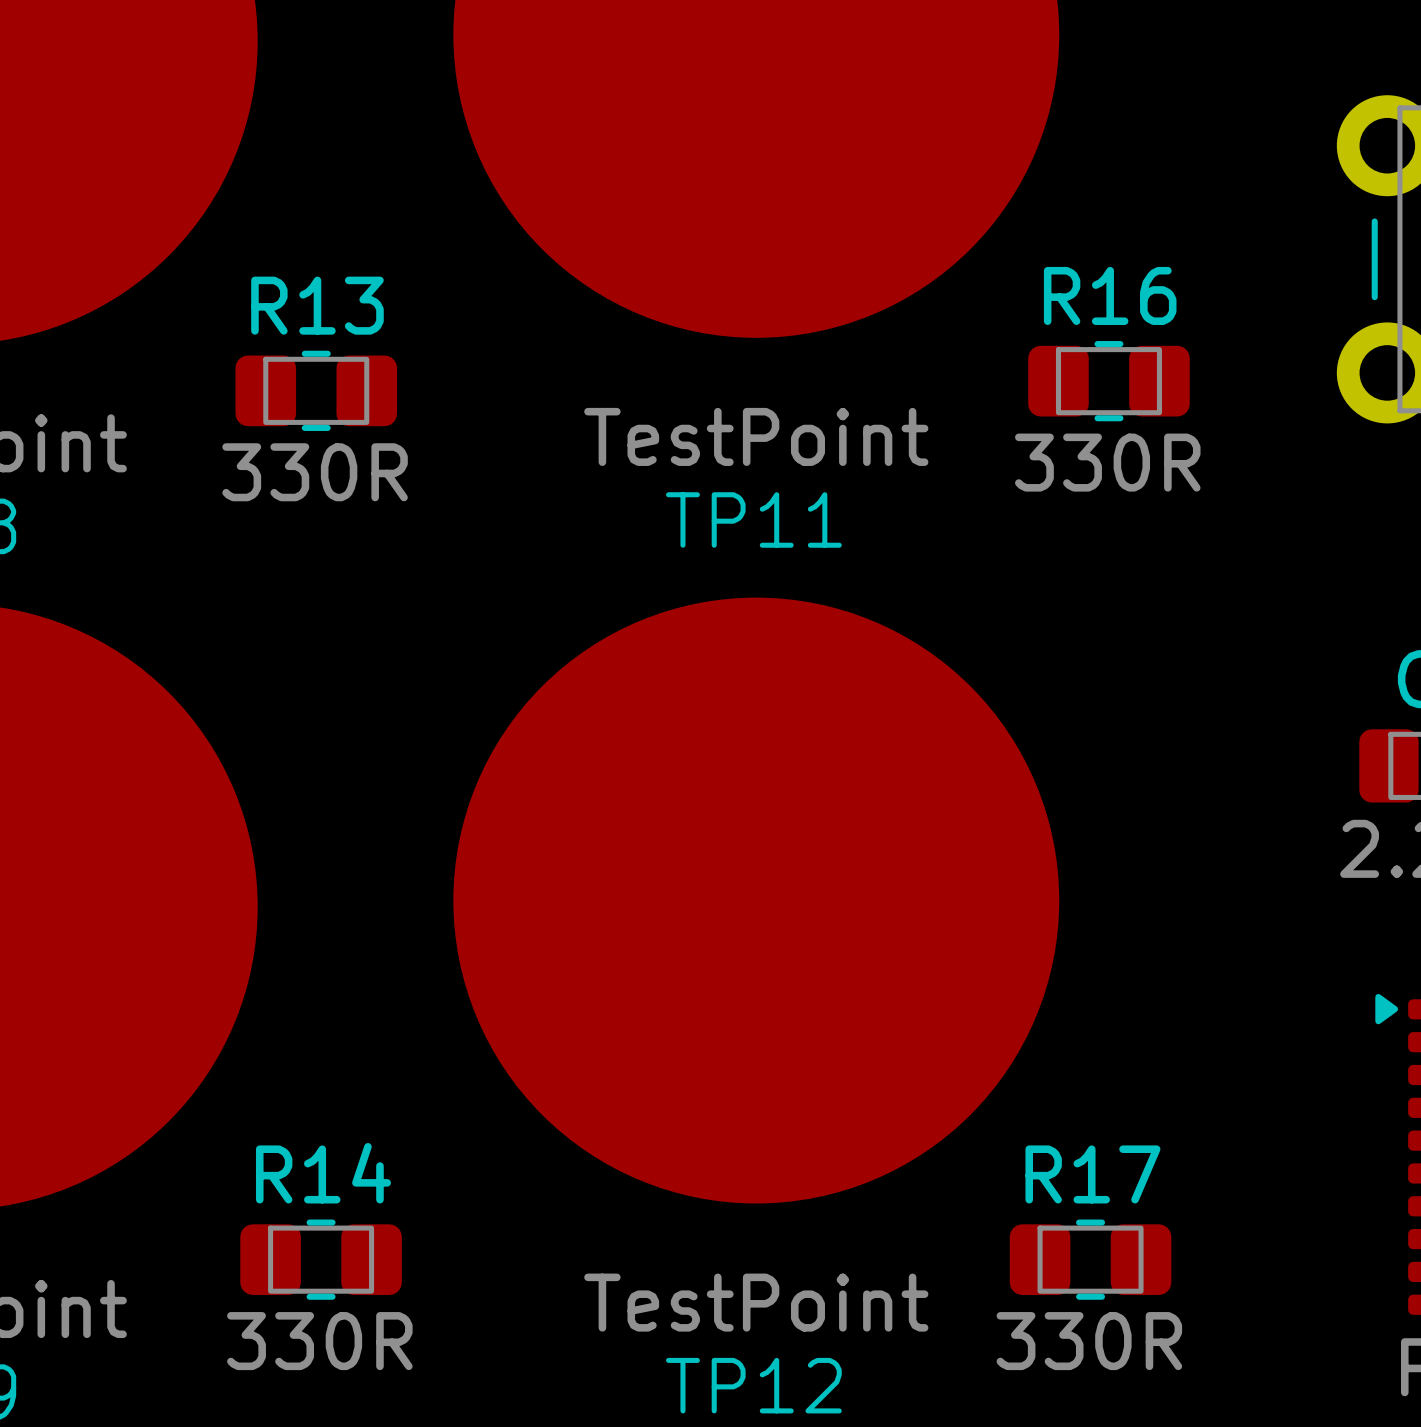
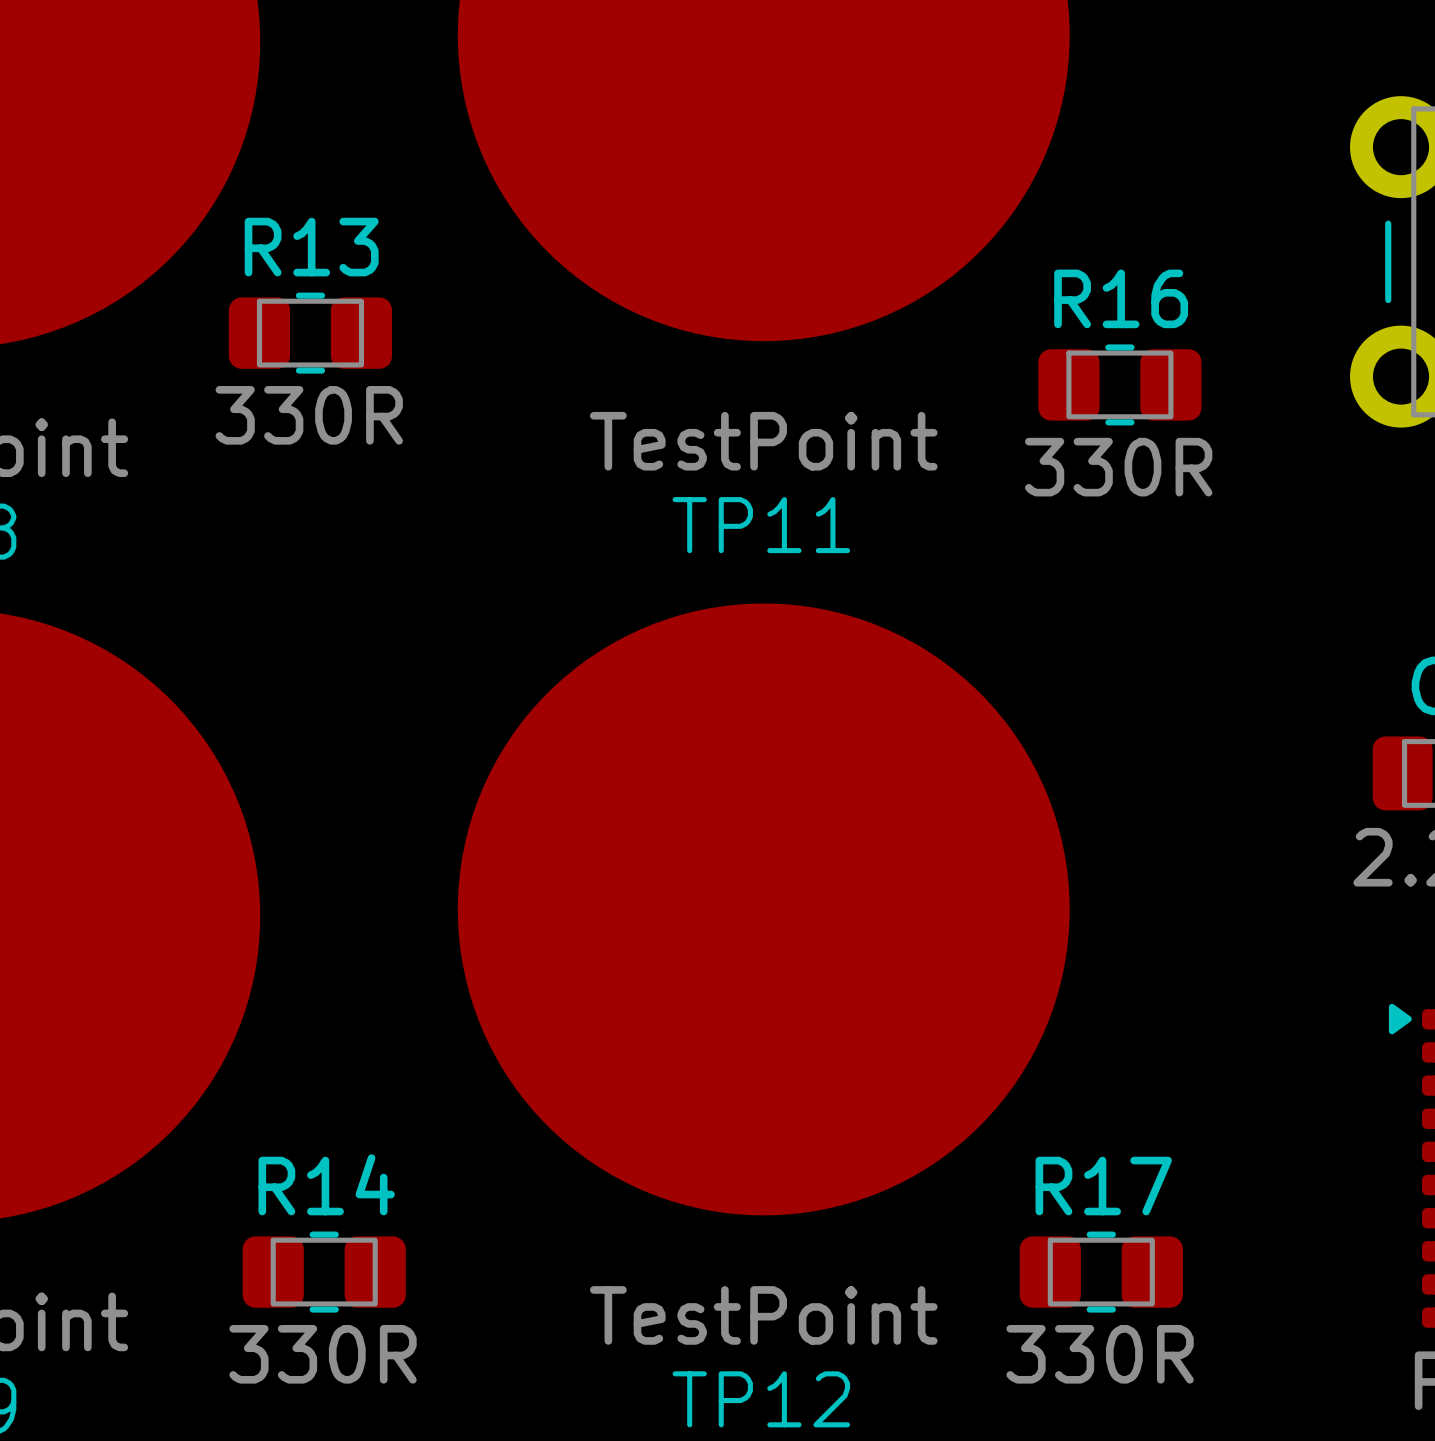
R13 position: (316, 390) -> (310, 333)

